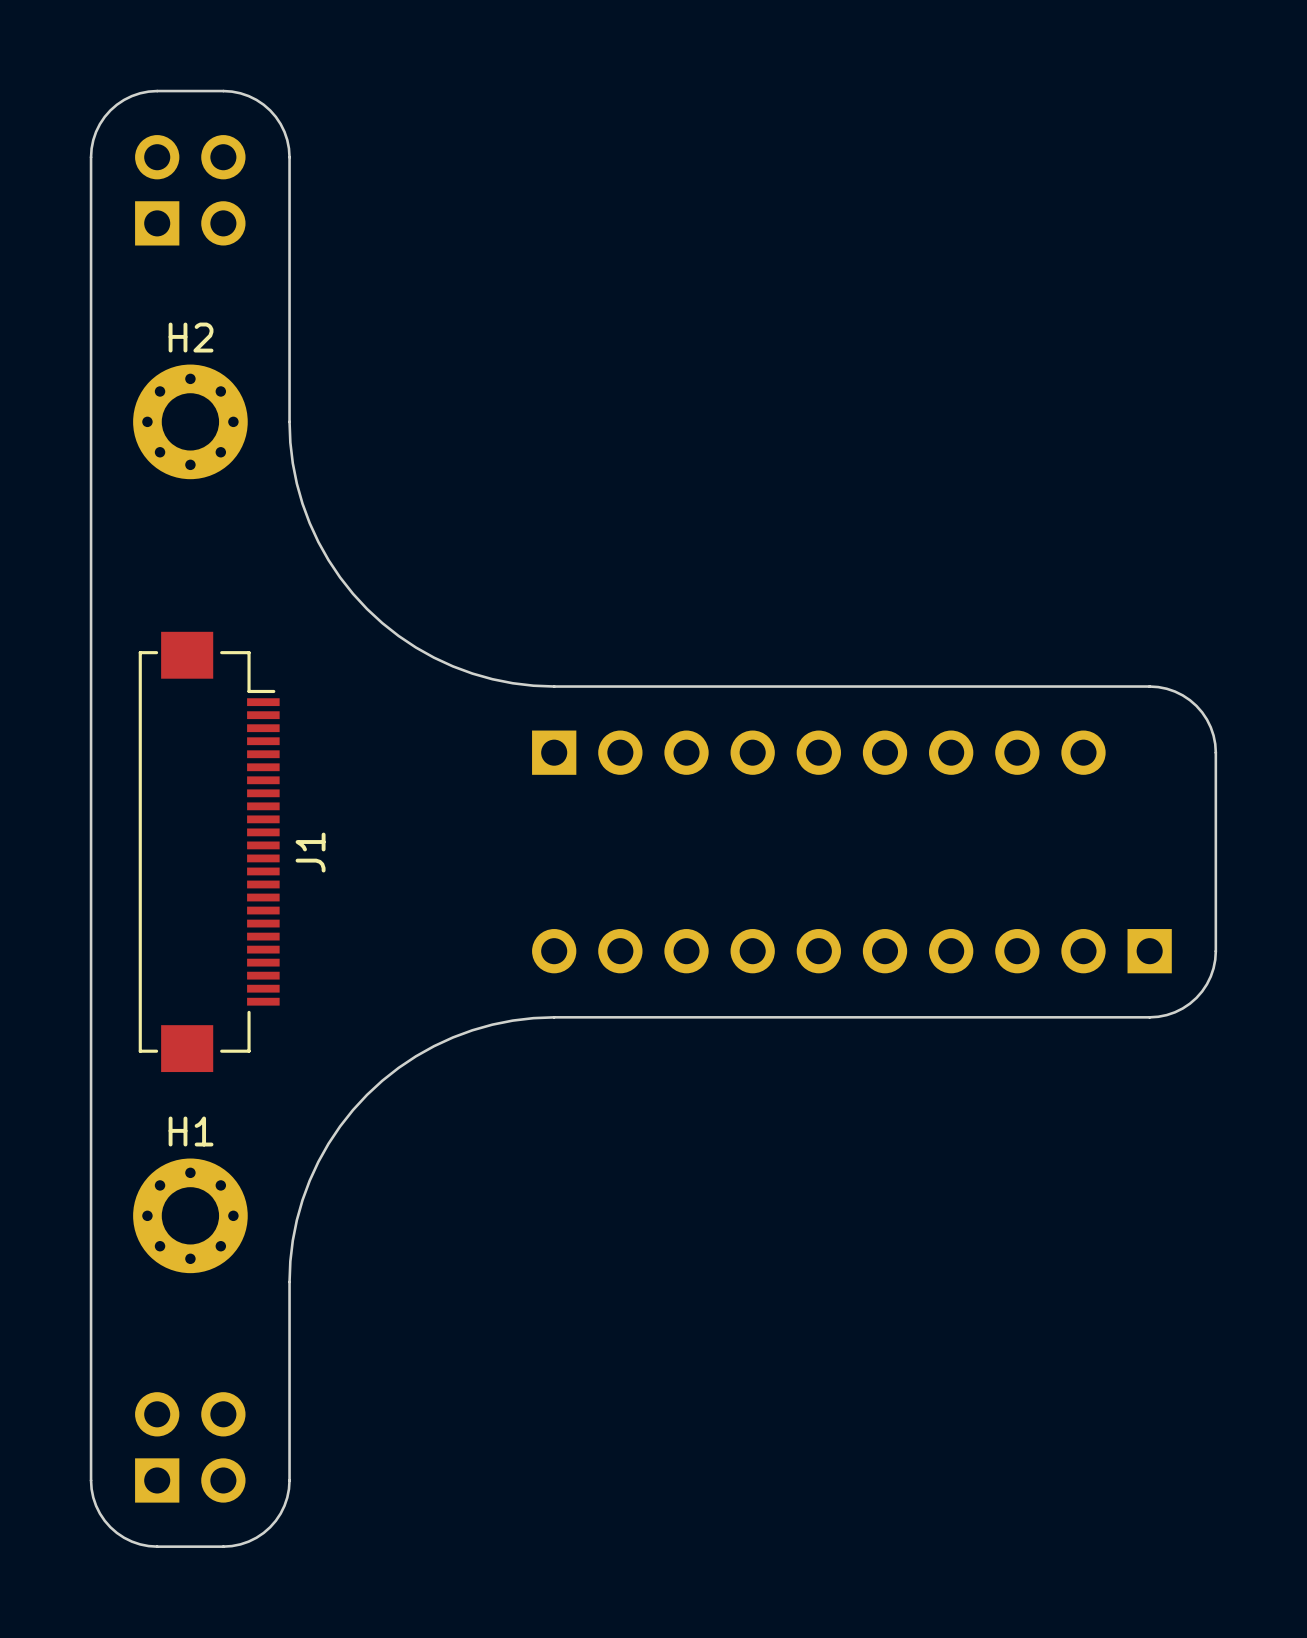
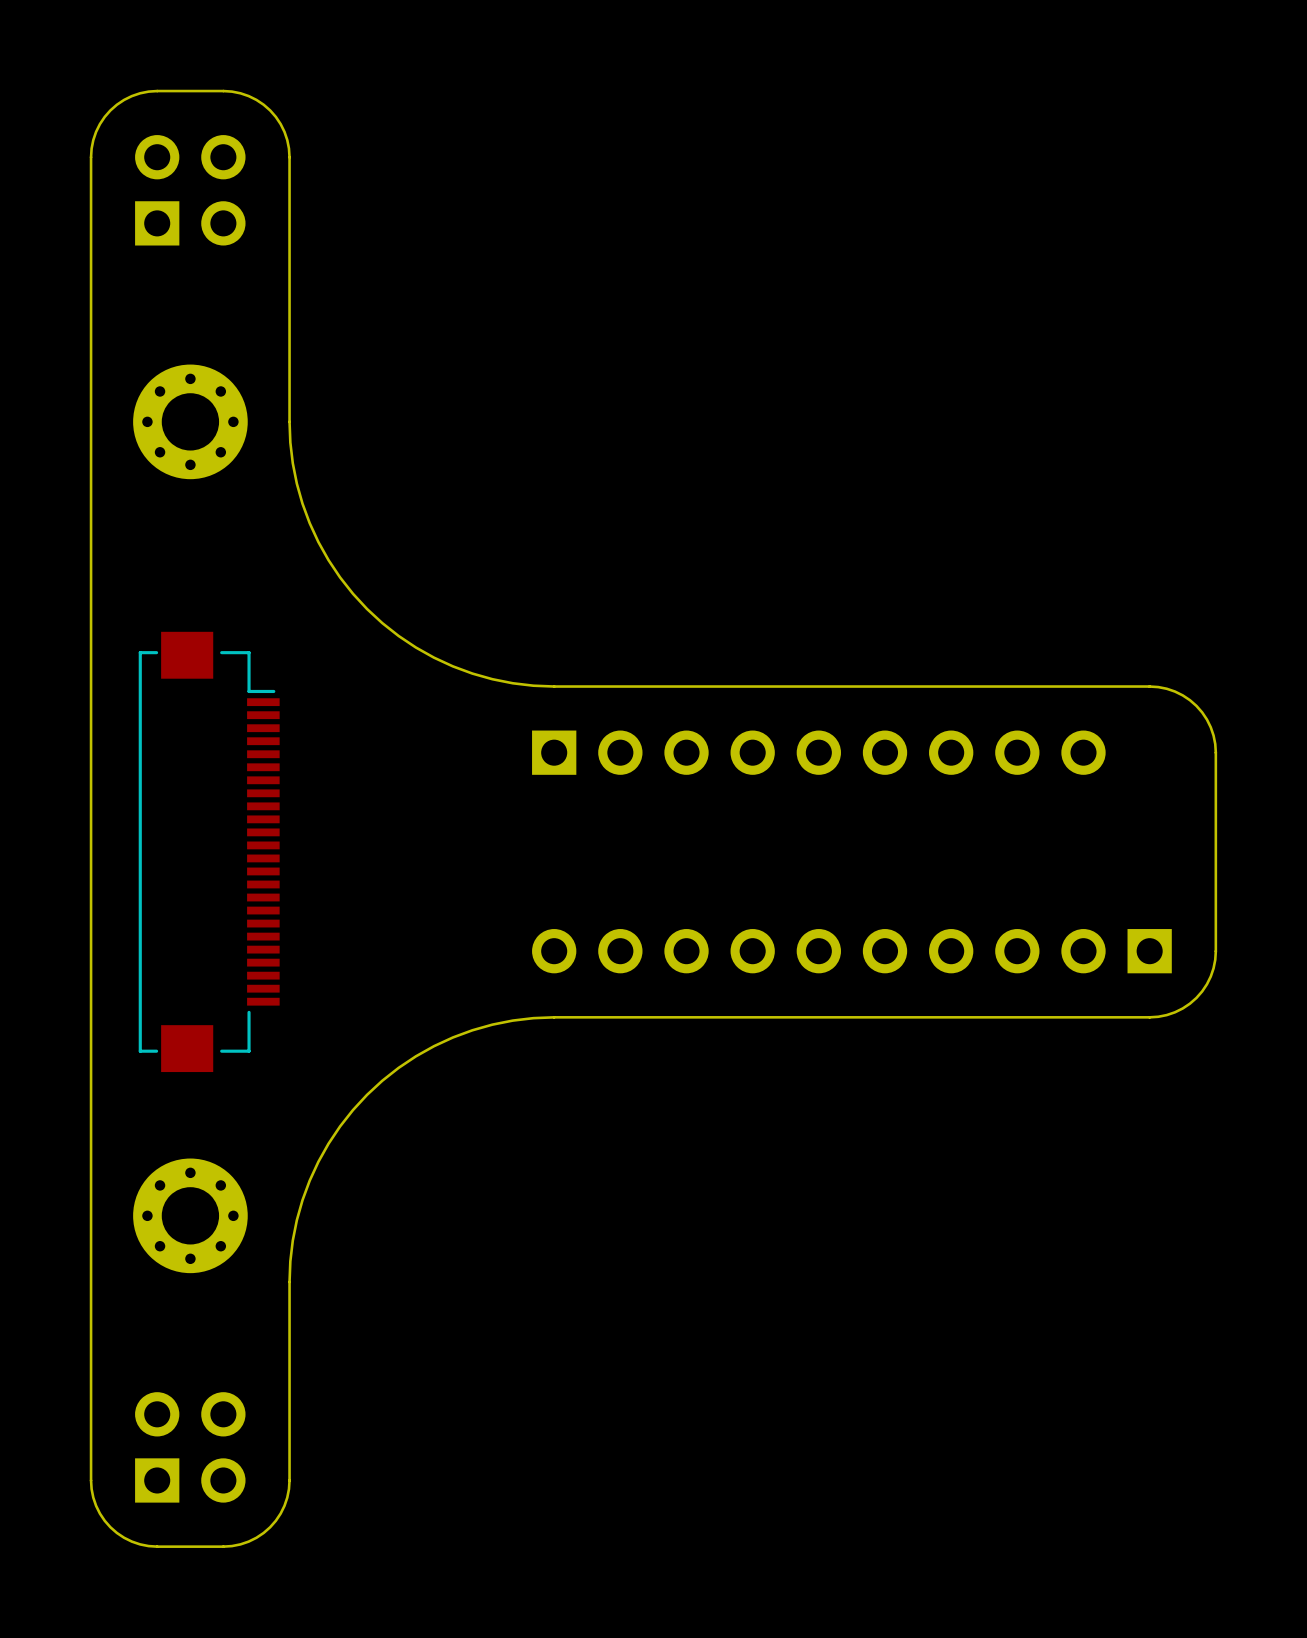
H2 name: H2 (191, 337) -> none
J1 name: J1 (310, 852) -> none
H1 name: H1 (191, 1131) -> none

